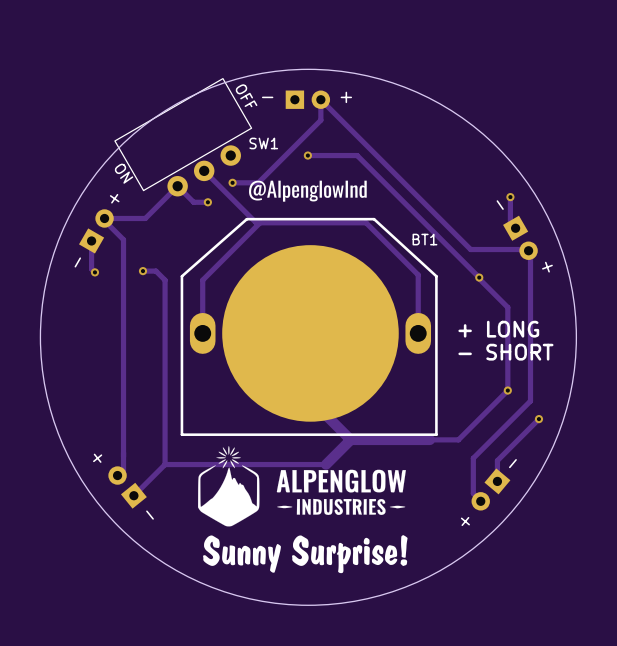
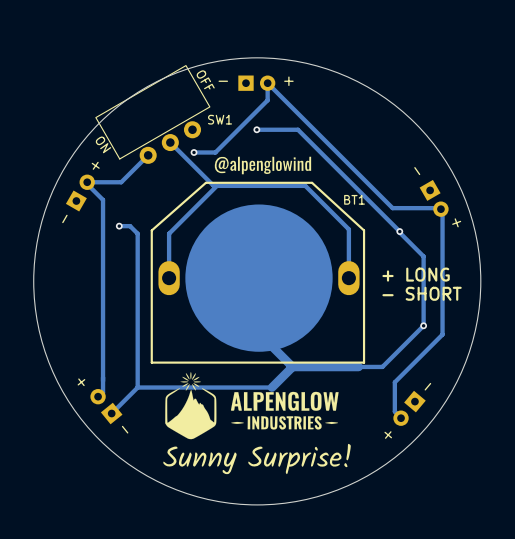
drawing: [249, 180, 367, 202] -> none
track: (177, 186) (193, 202) (207, 202) -> none
drawing: none -> [214, 156, 312, 175]
track: (510, 197) (510, 223) (515, 228) -> none
via: (510, 197) -> none
via: (207, 202) -> none
track: (91, 240) (91, 269) (94, 272) -> none
via: (94, 272) -> none
track: (538, 419) (497, 460) (497, 481) -> none
via: (538, 419) -> none
drawing shape: [203, 535, 408, 574] -> [163, 443, 351, 475]

